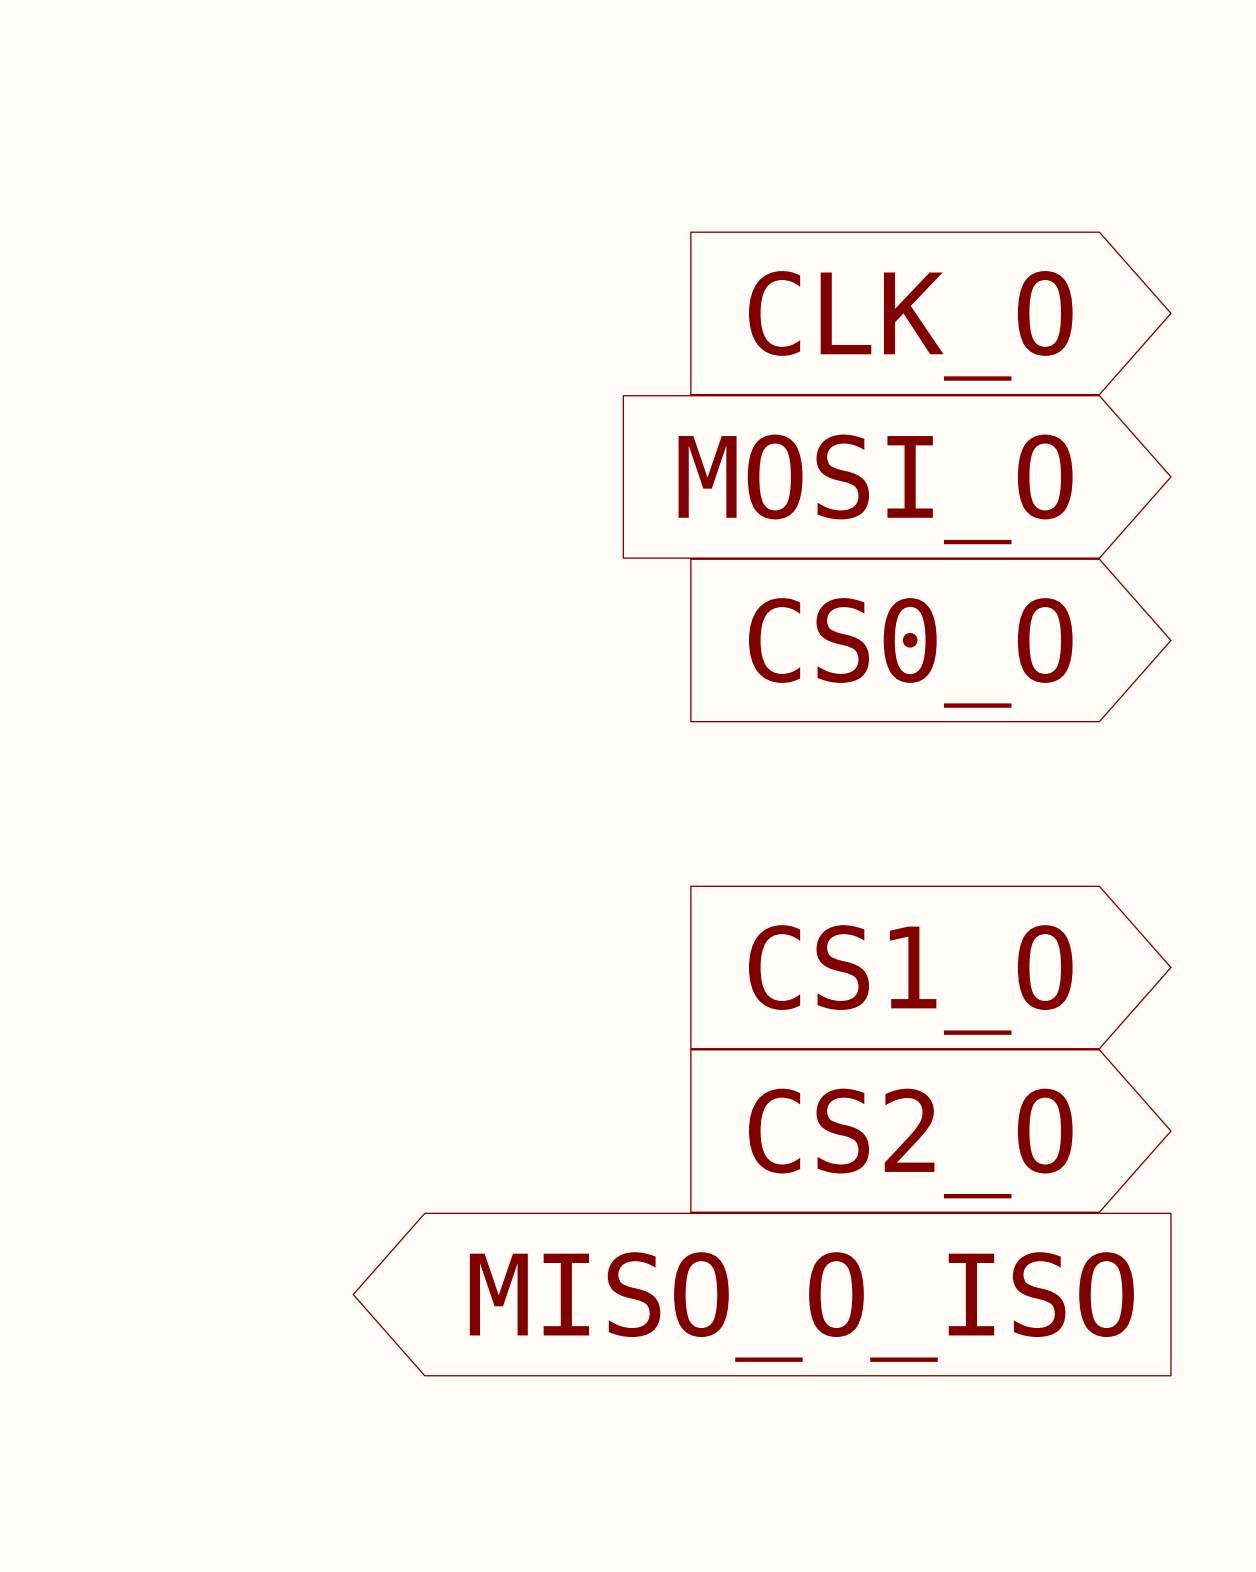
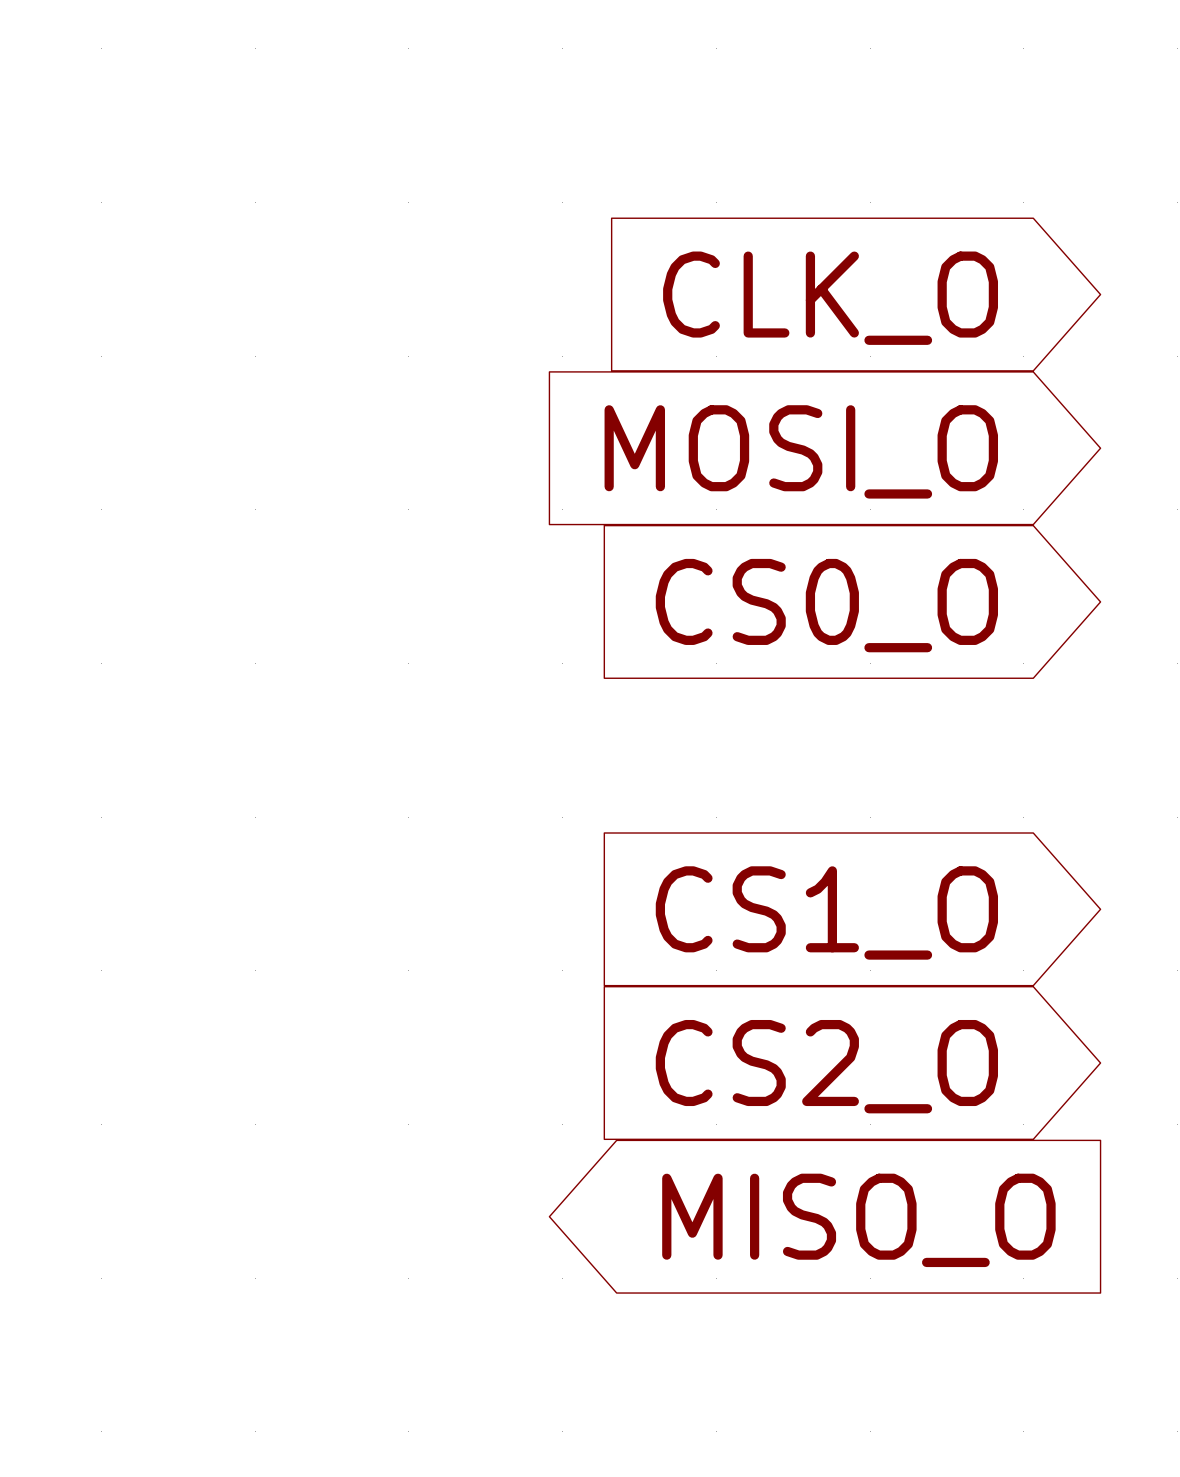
global label: MISO_O_ISO (801, 1307) -> MISO_O (858, 1220)

